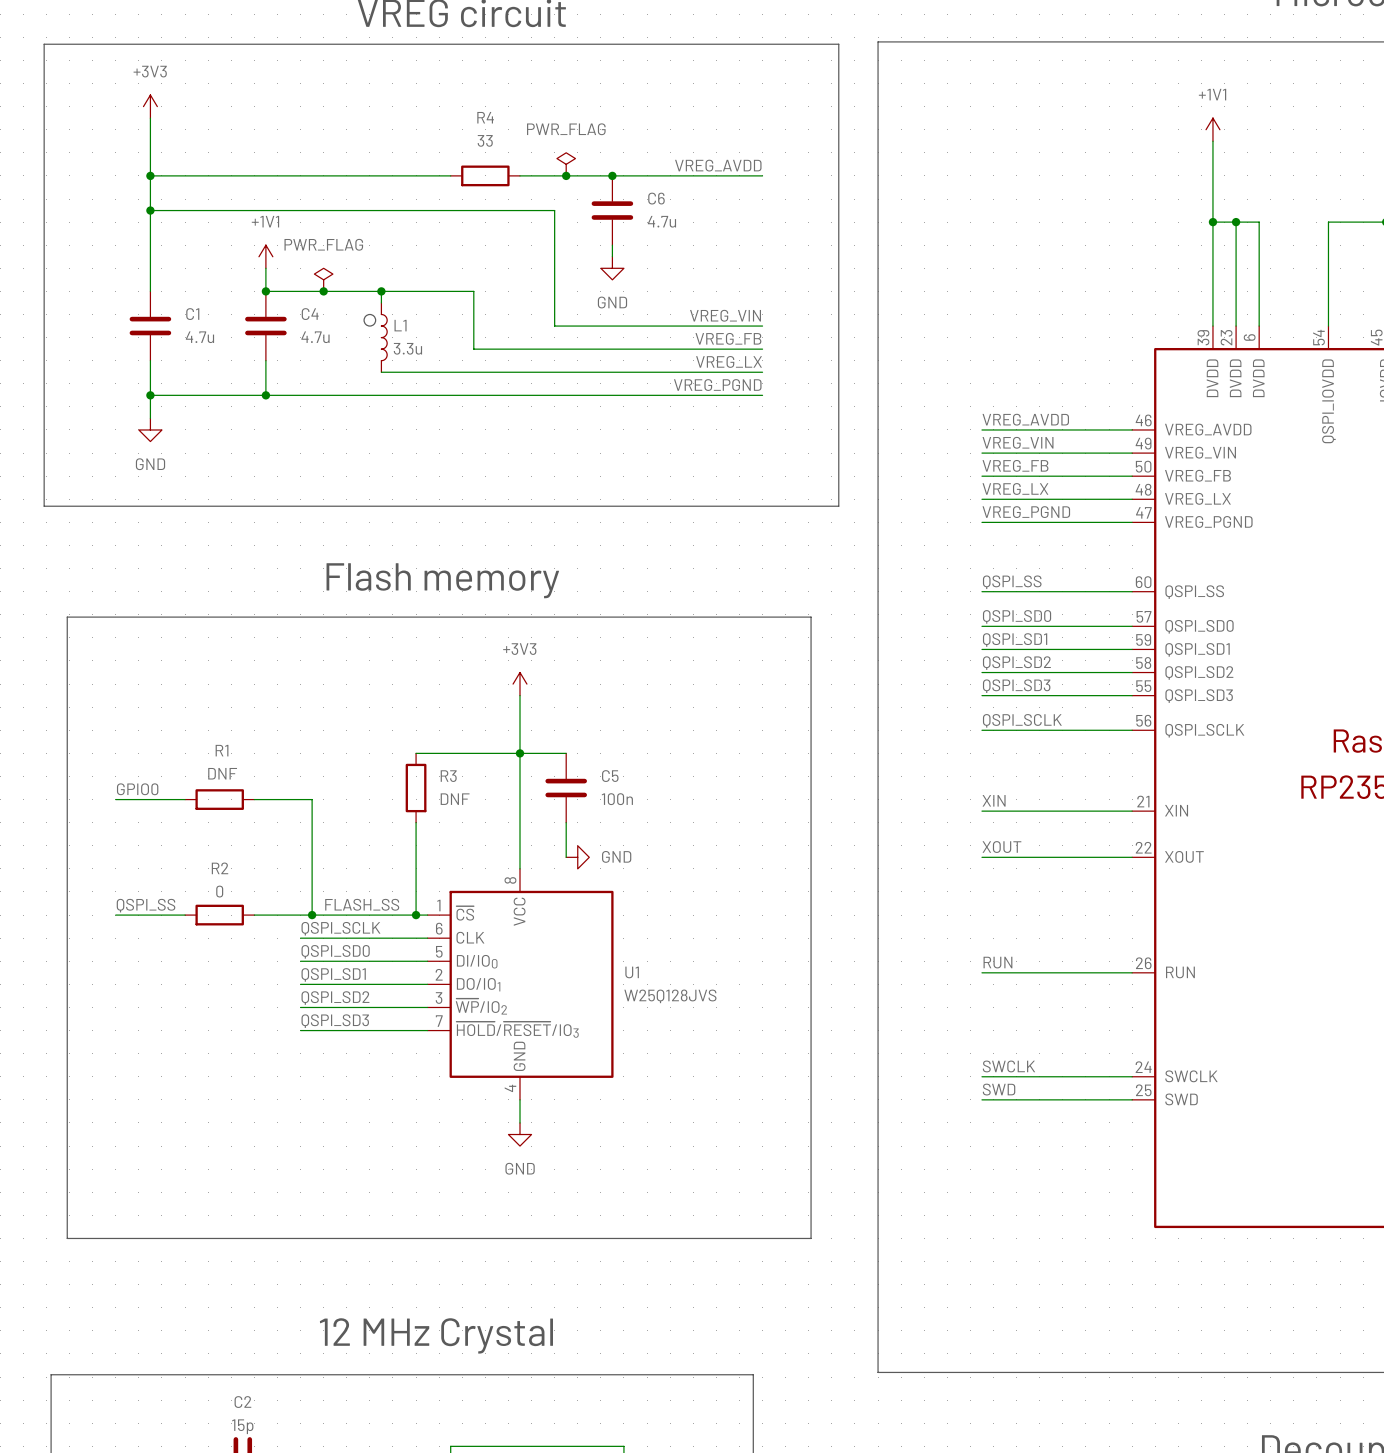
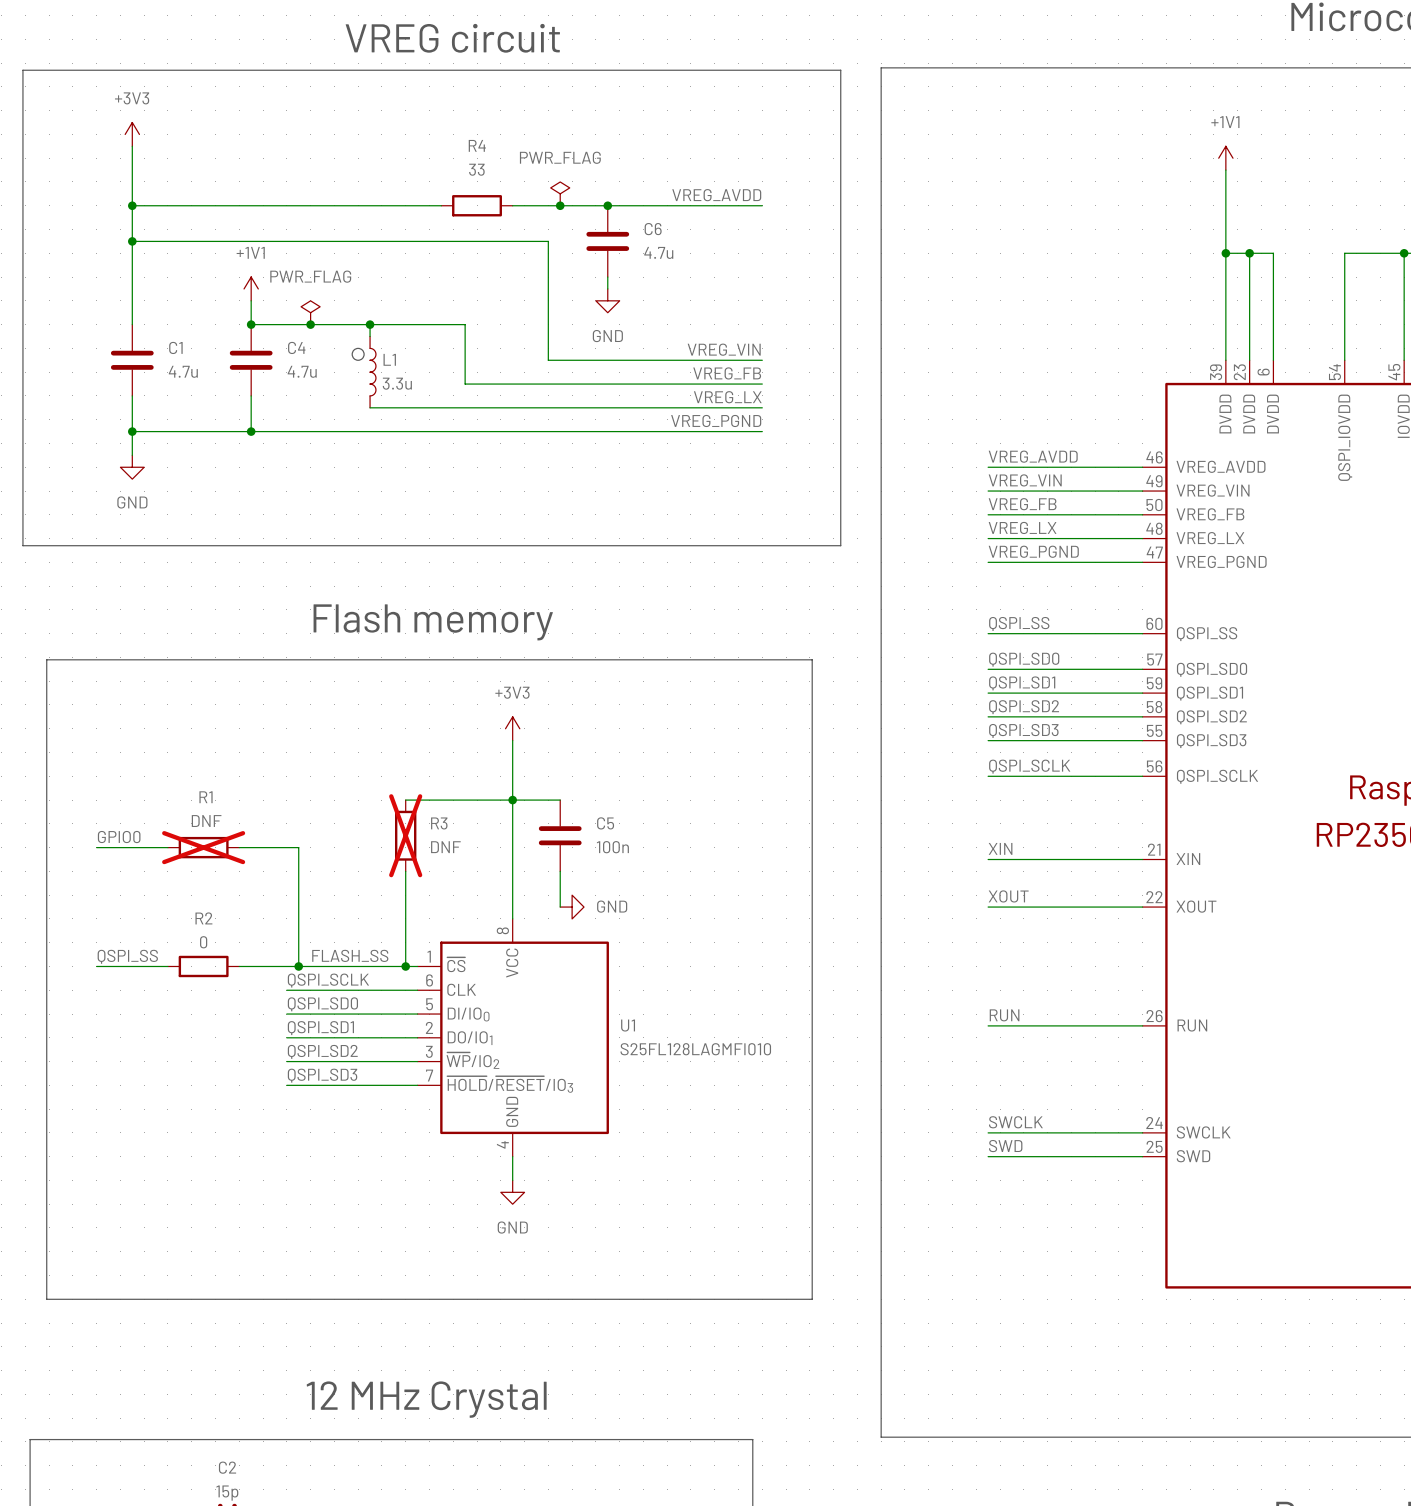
R3 do-not-place cross: none -> (405, 835)
R1 do-not-place cross: none -> (203, 847)
U1 value: W25Q128JVS (670, 996) -> S25FL128LAGMFI010 (695, 1049)

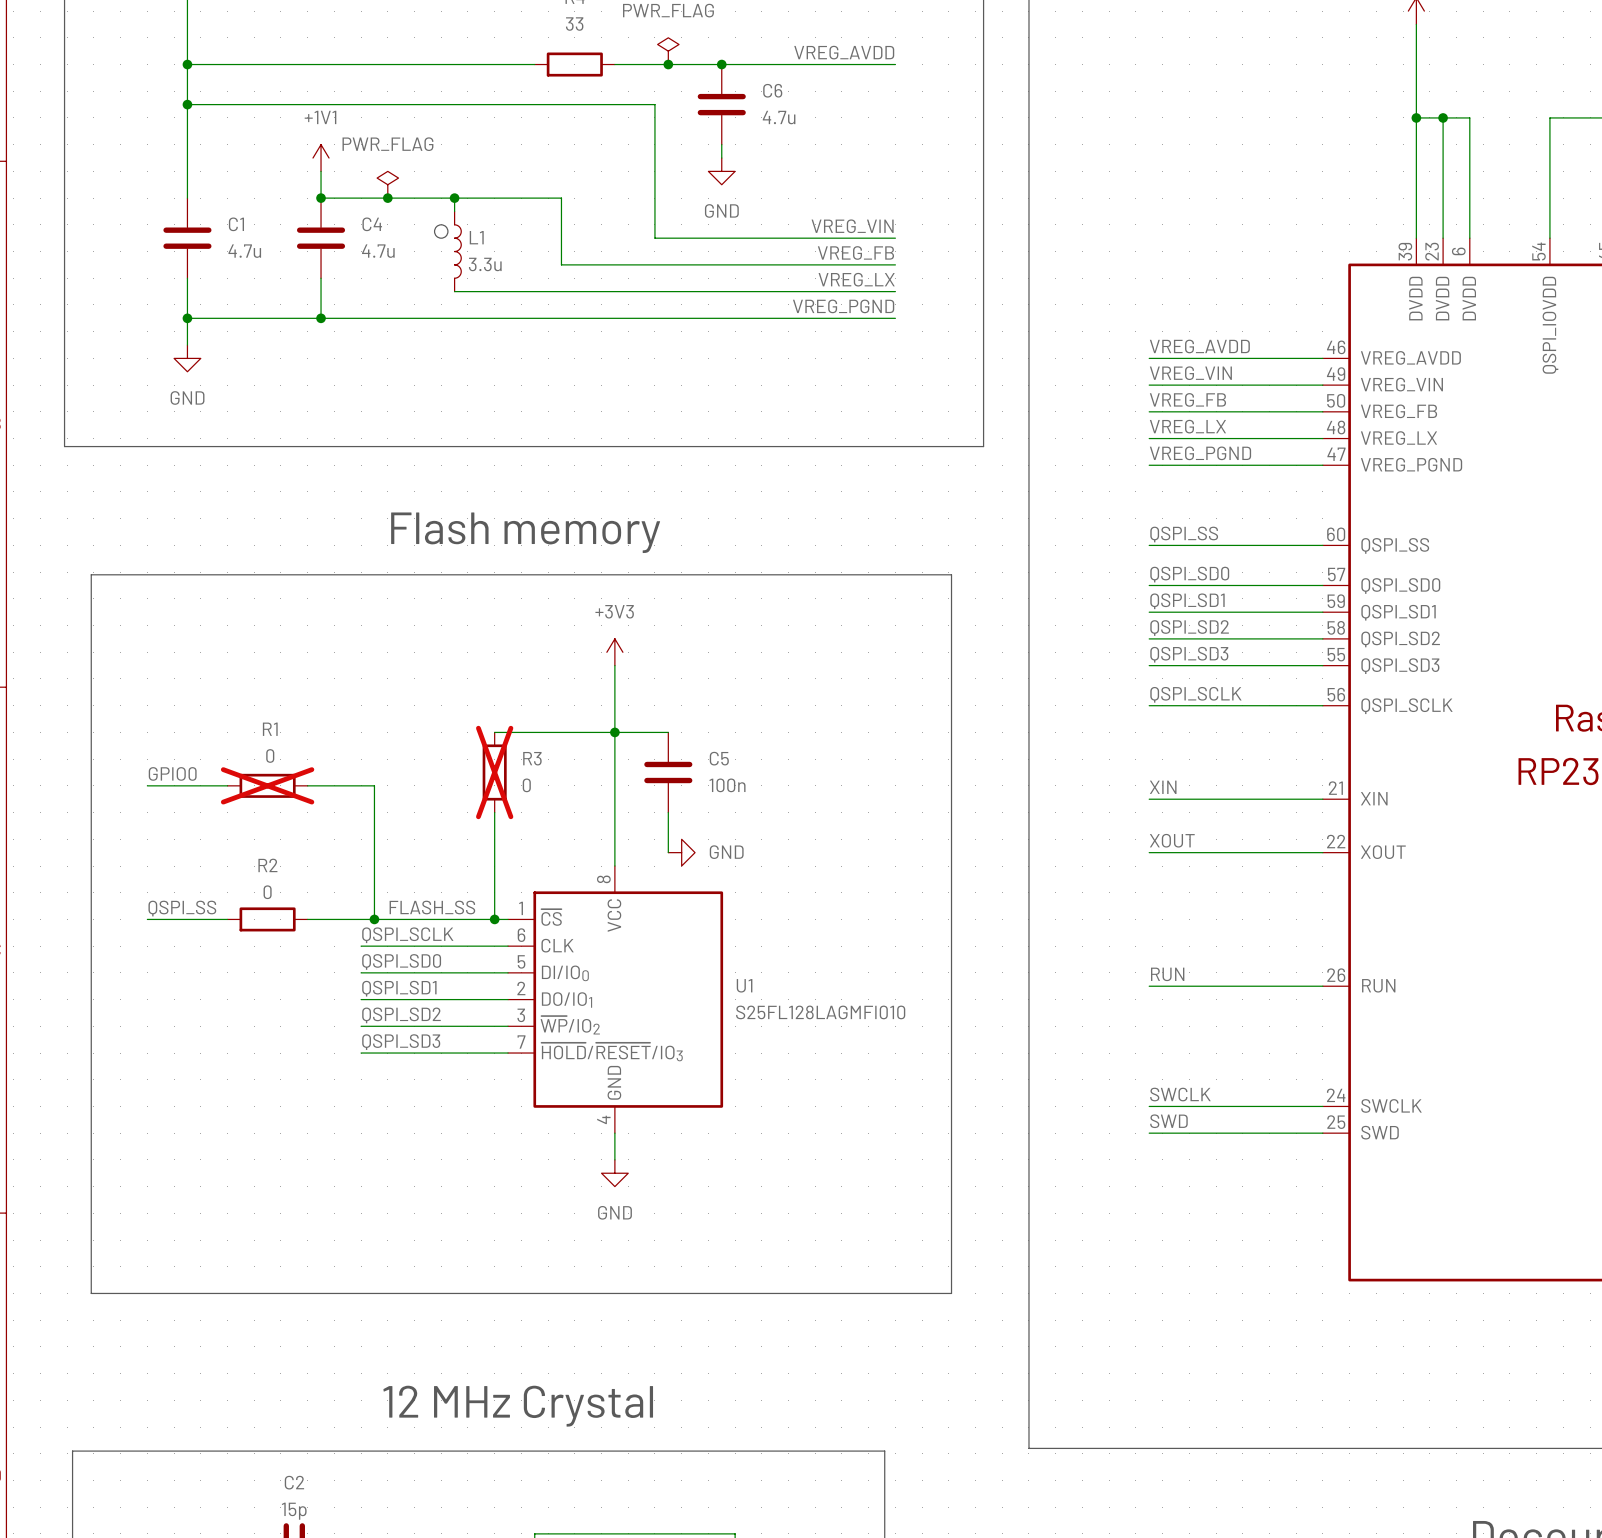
R1 value: DNF (206, 821) -> 0 (270, 755)
R3 value: DNF (445, 847) -> 0 (526, 785)

